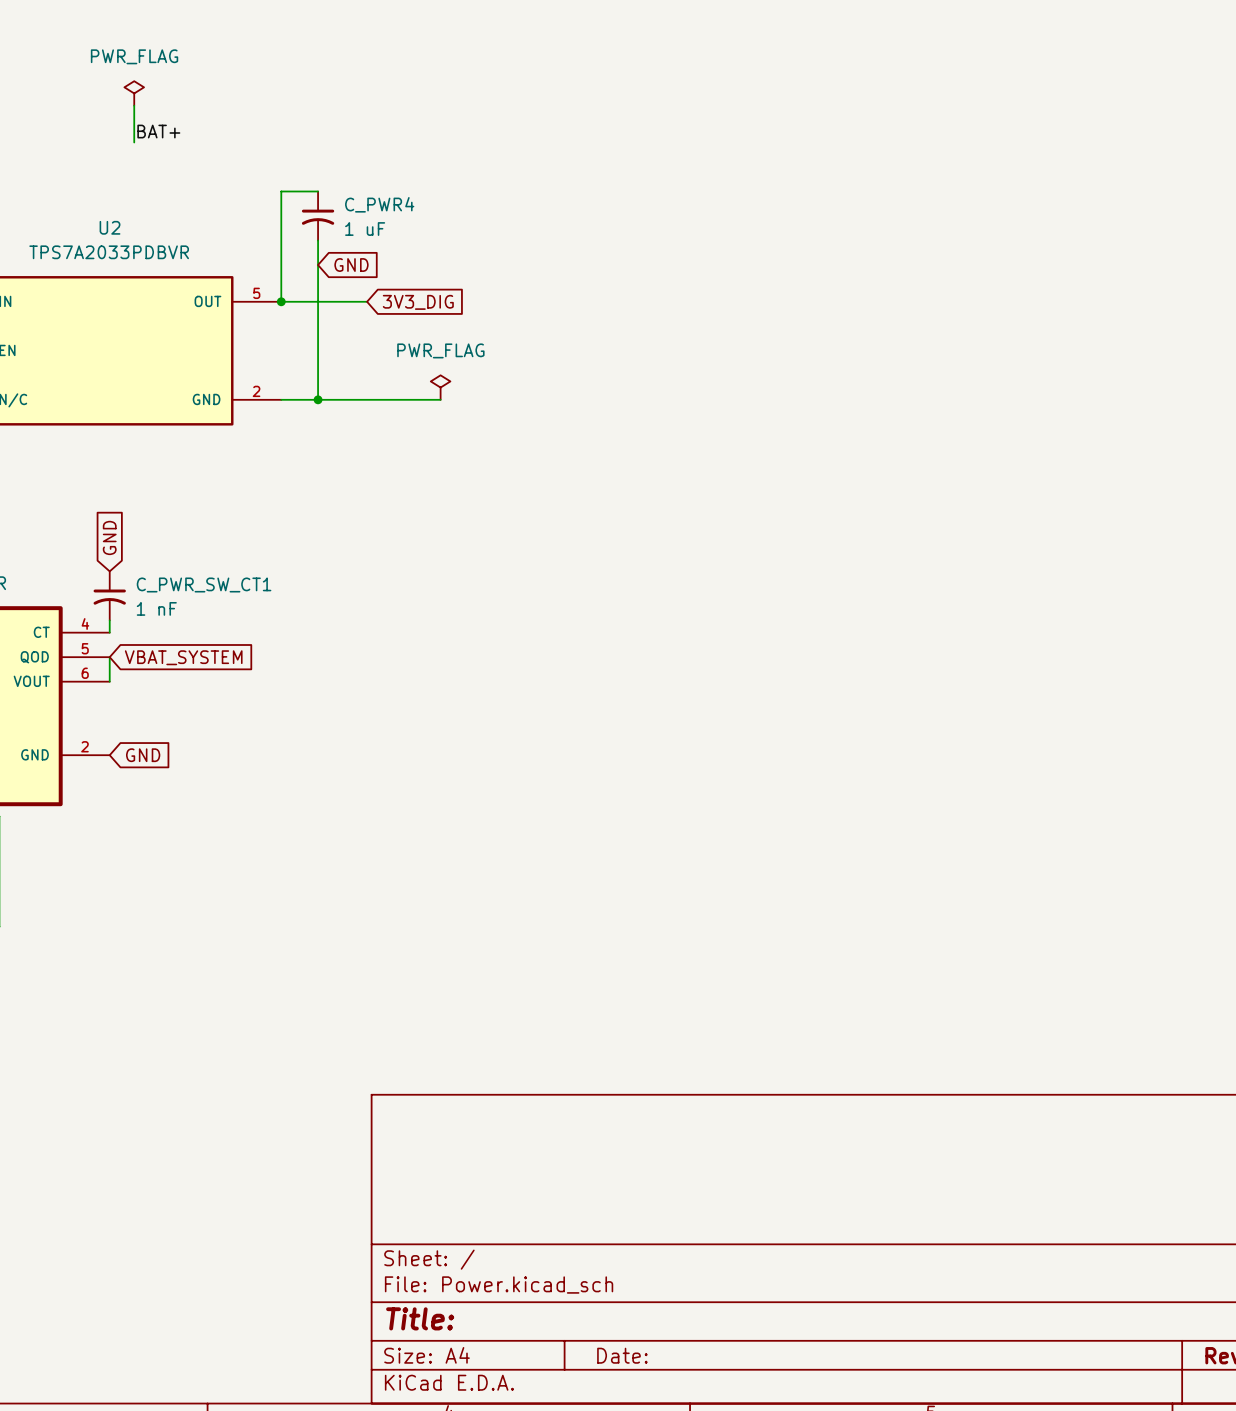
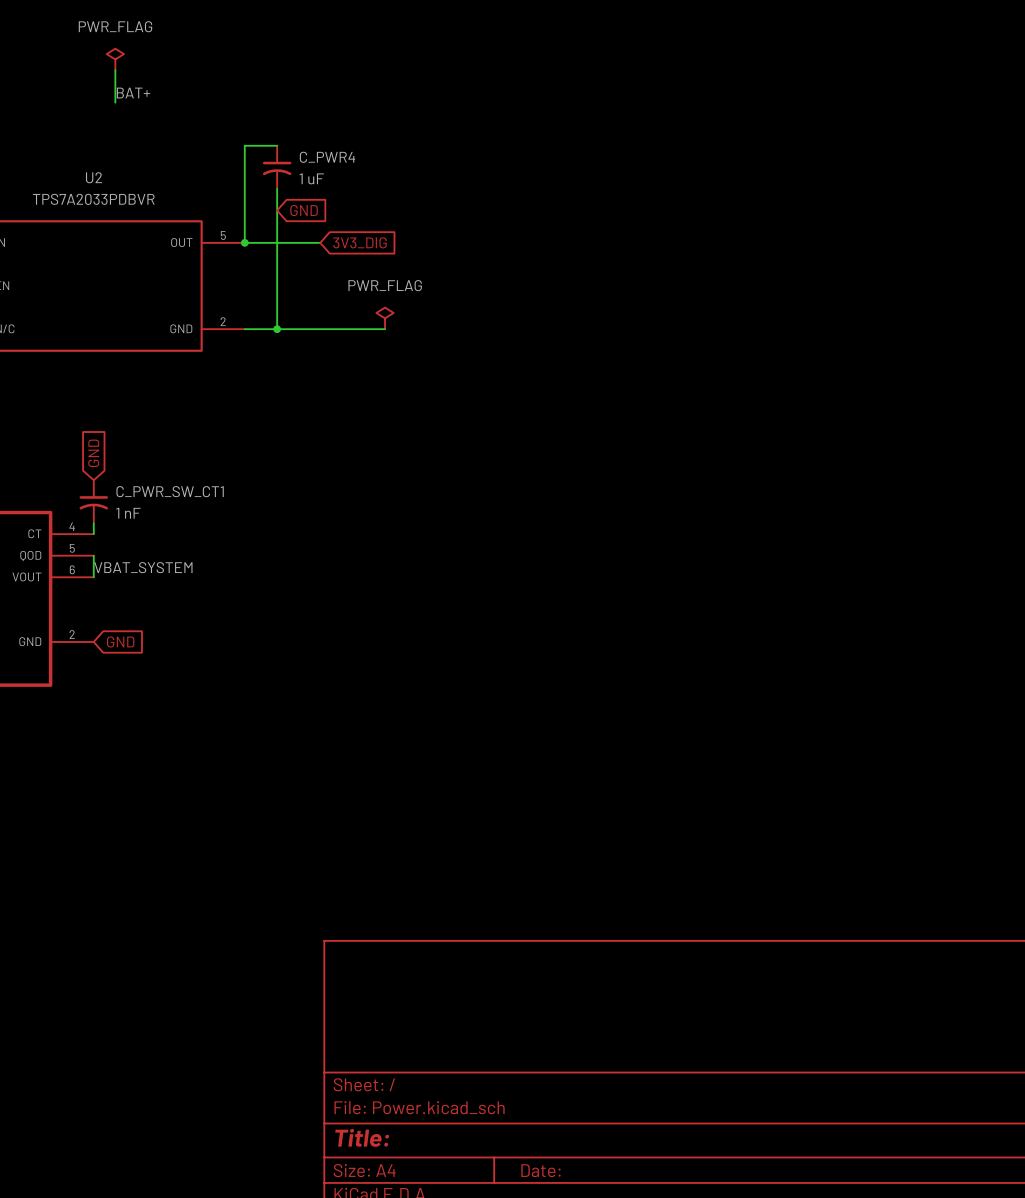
global label: VBAT_SYSTEM (183, 657) -> none
label: none -> VBAT_SYSTEM (143, 567)

